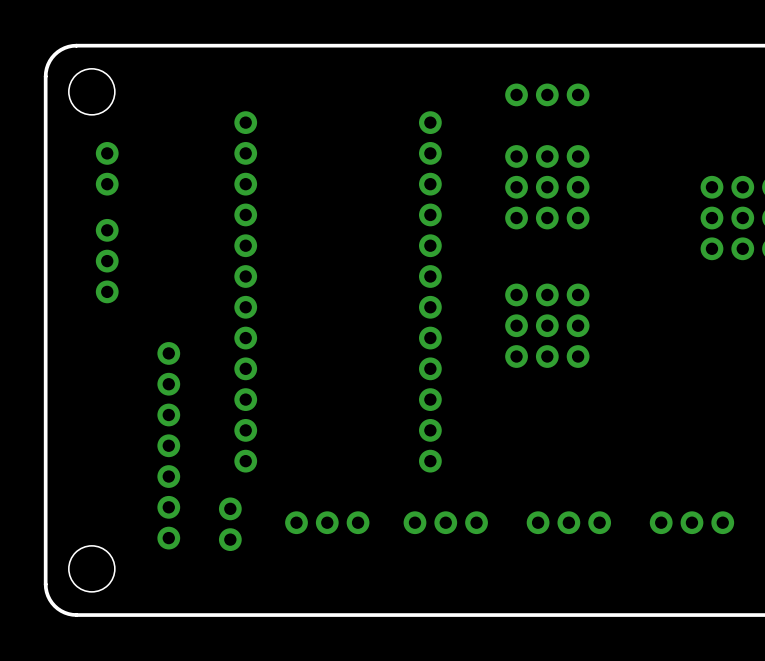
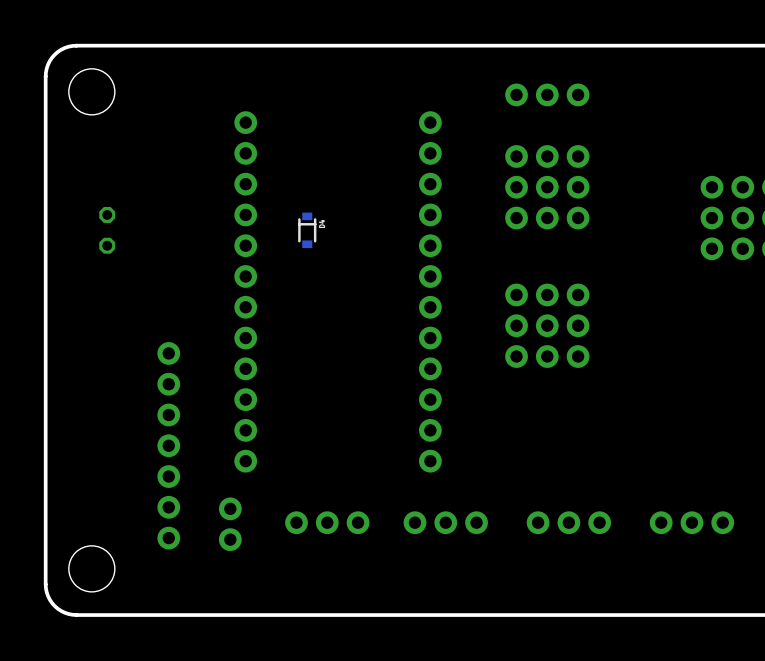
part: (107, 168) -> none
part: none -> (107, 230)
part: none -> (307, 230)
part: (107, 261) -> none

